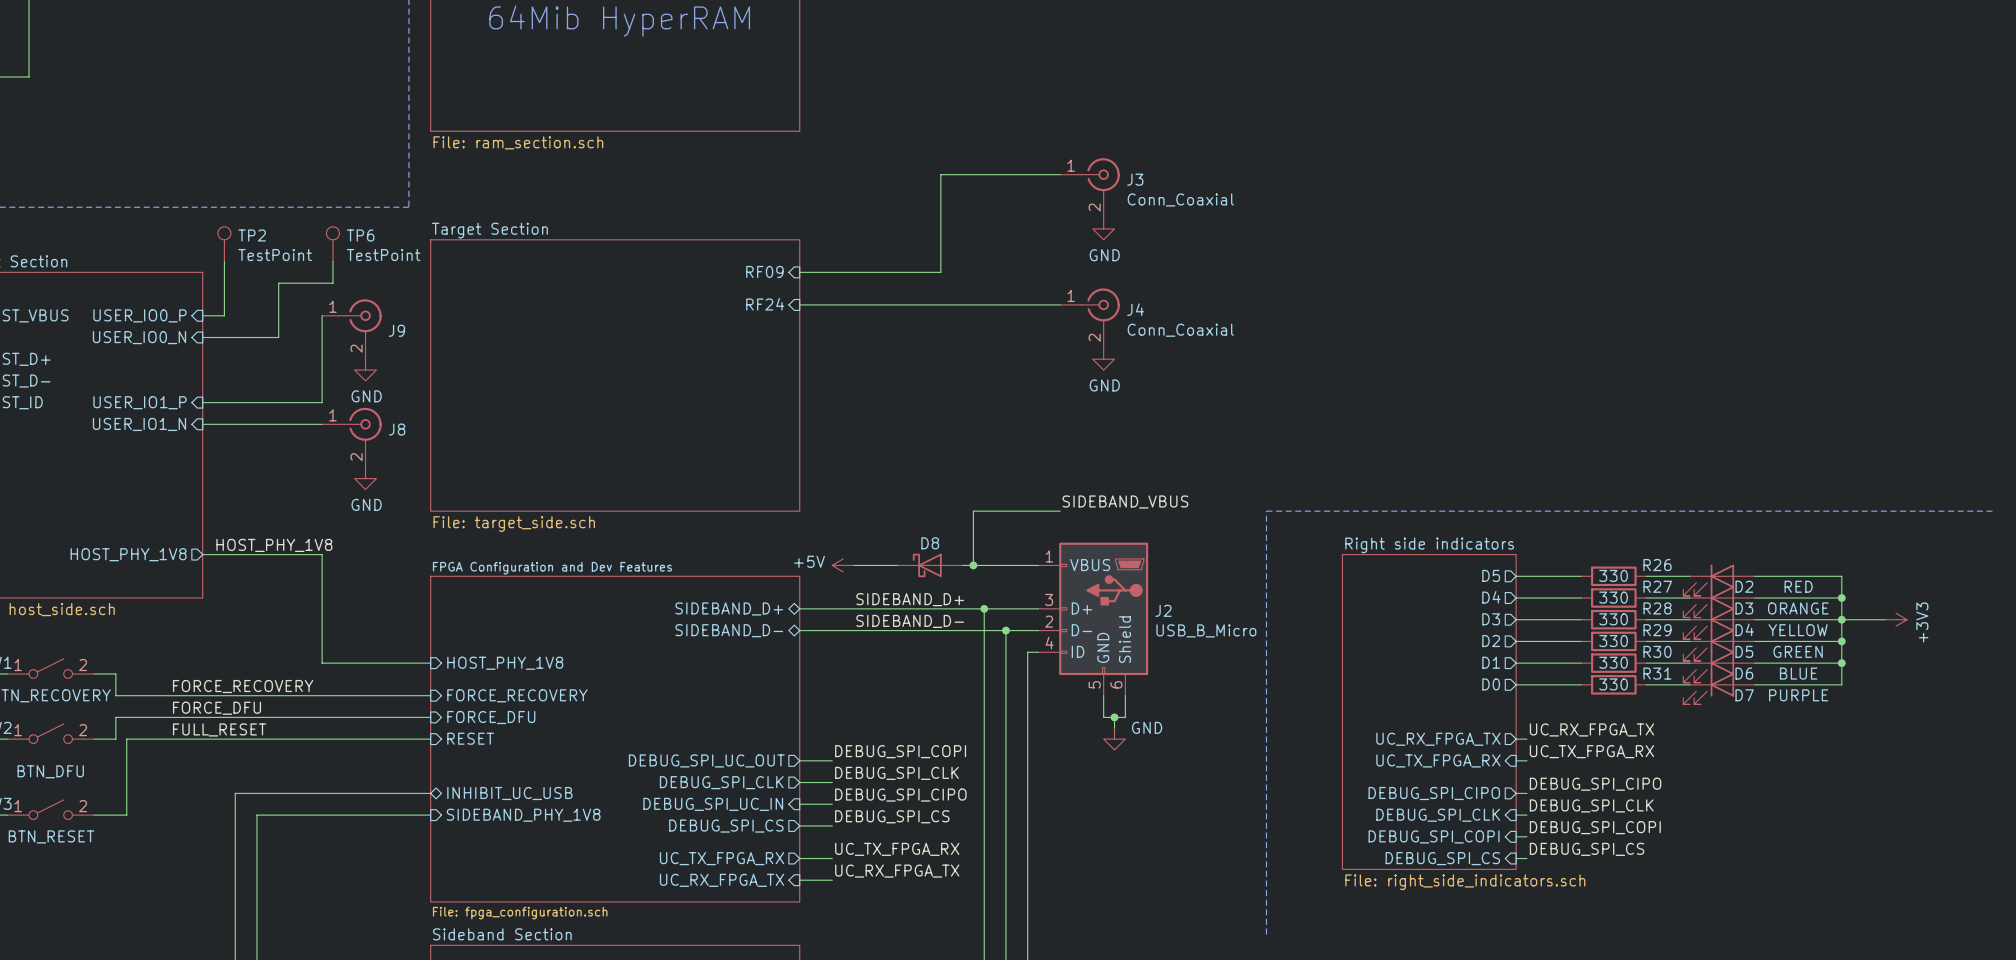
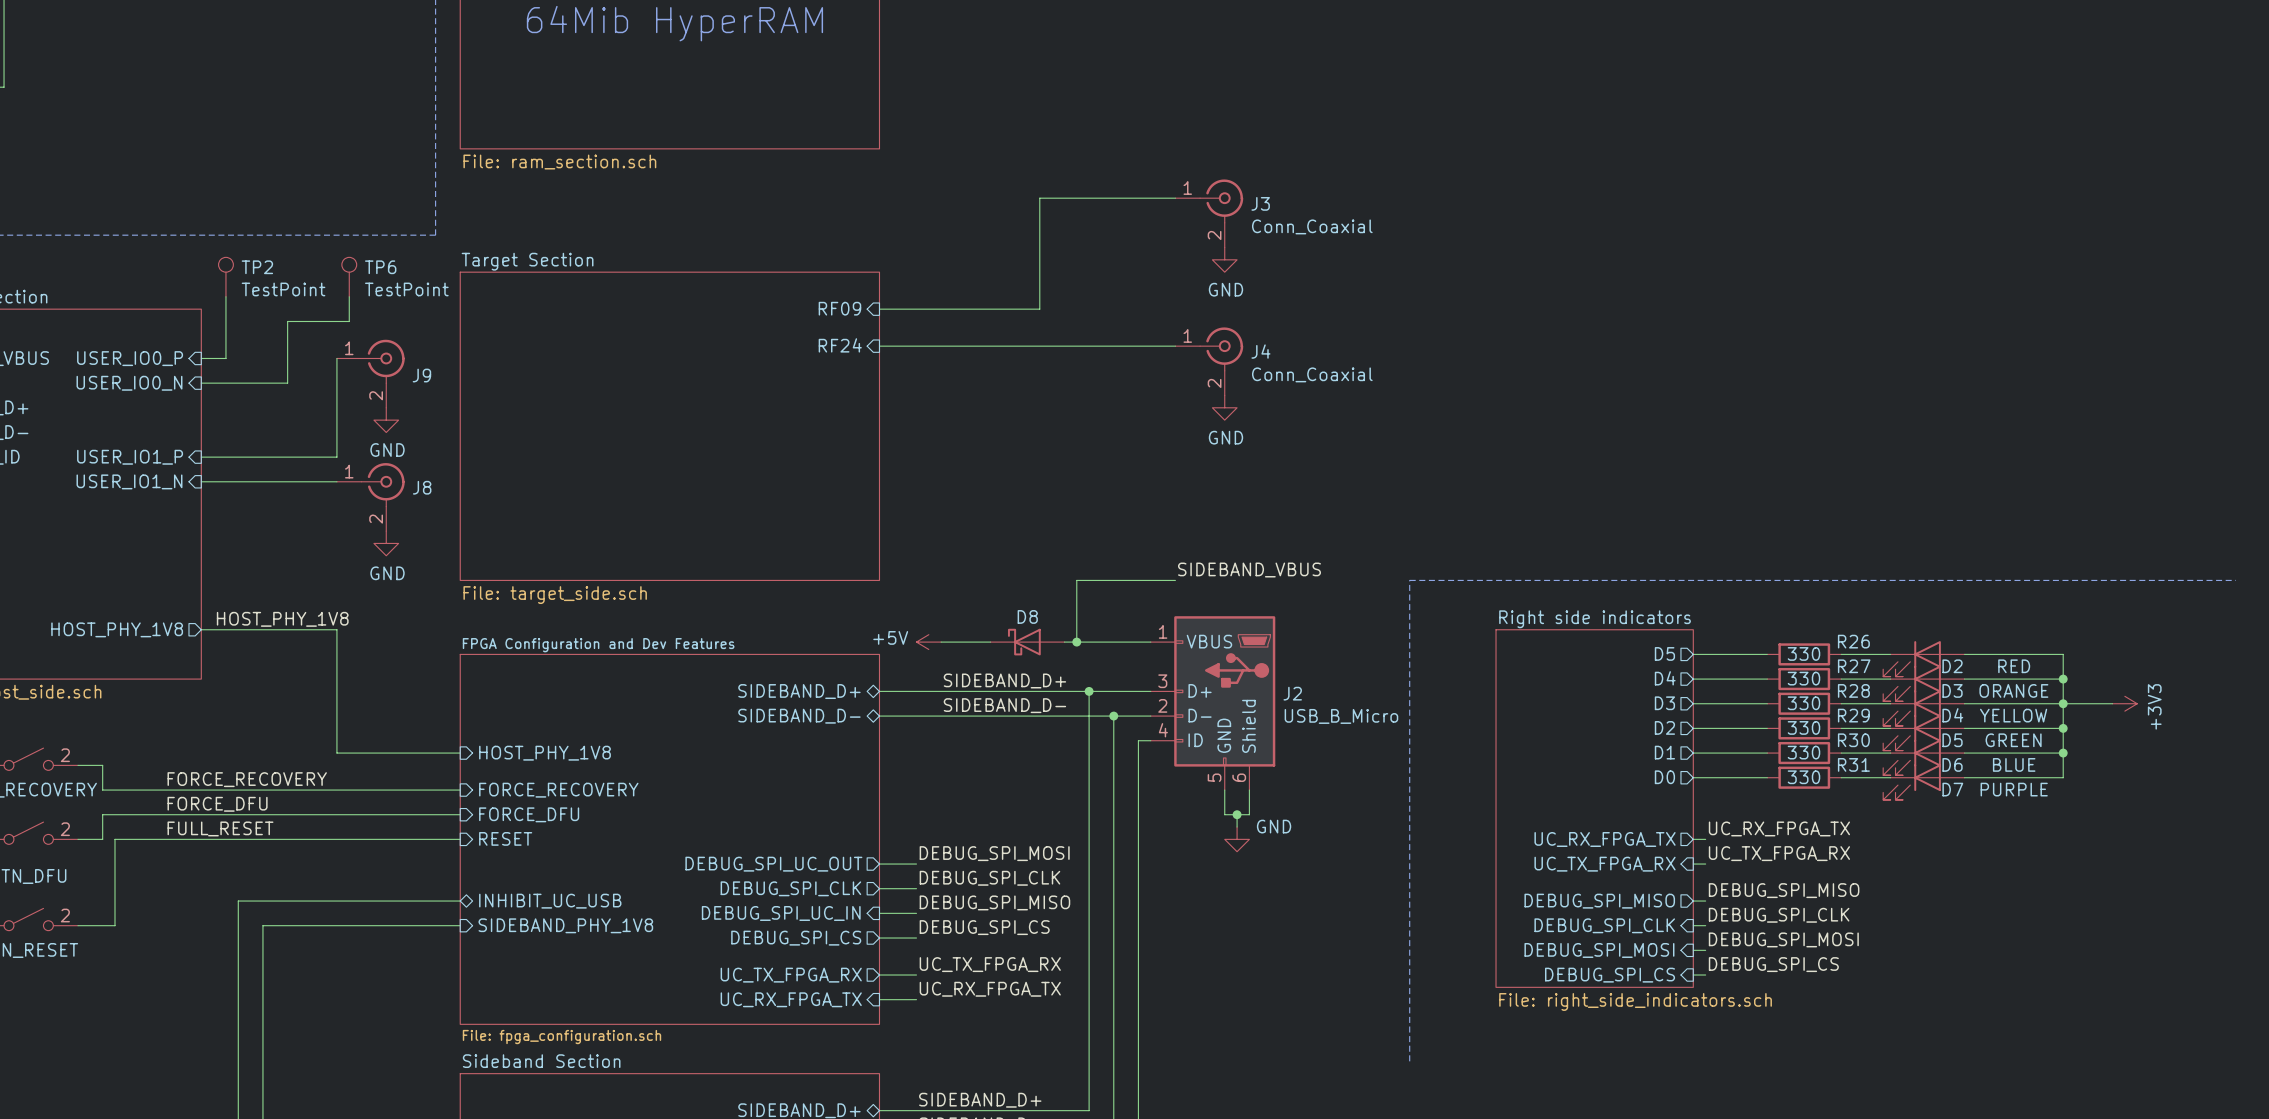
label: DEBUG_SPI_COPI (900, 751) -> DEBUG_SPI_MOSI (994, 853)
label: DEBUG_SPI_CIPO (1595, 784) -> DEBUG_SPI_MISO (1784, 890)
sheet pin: DEBUG_SPI_CIPO (1434, 793) -> DEBUG_SPI_MISO (1599, 901)
label: DEBUG_SPI_CIPO (900, 795) -> DEBUG_SPI_MISO (994, 902)
label: DEBUG_SPI_COPI (1595, 827) -> DEBUG_SPI_MOSI (1783, 939)
sheet pin: DEBUG_SPI_COPI (1434, 836) -> DEBUG_SPI_MOSI (1599, 950)

